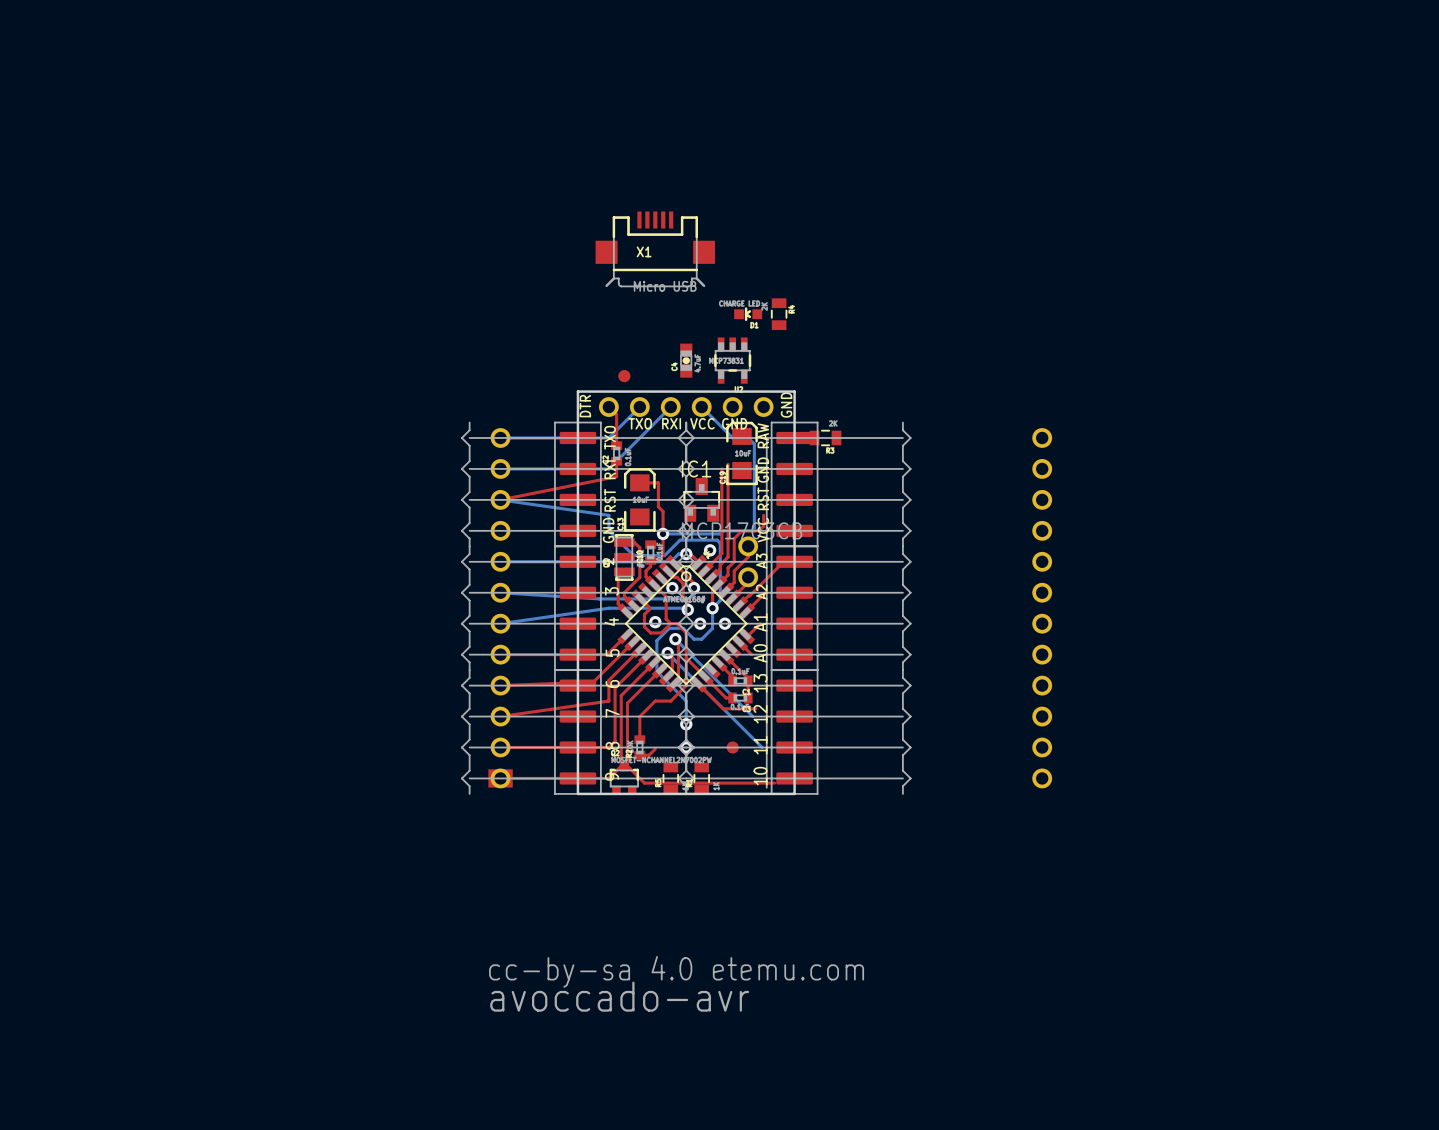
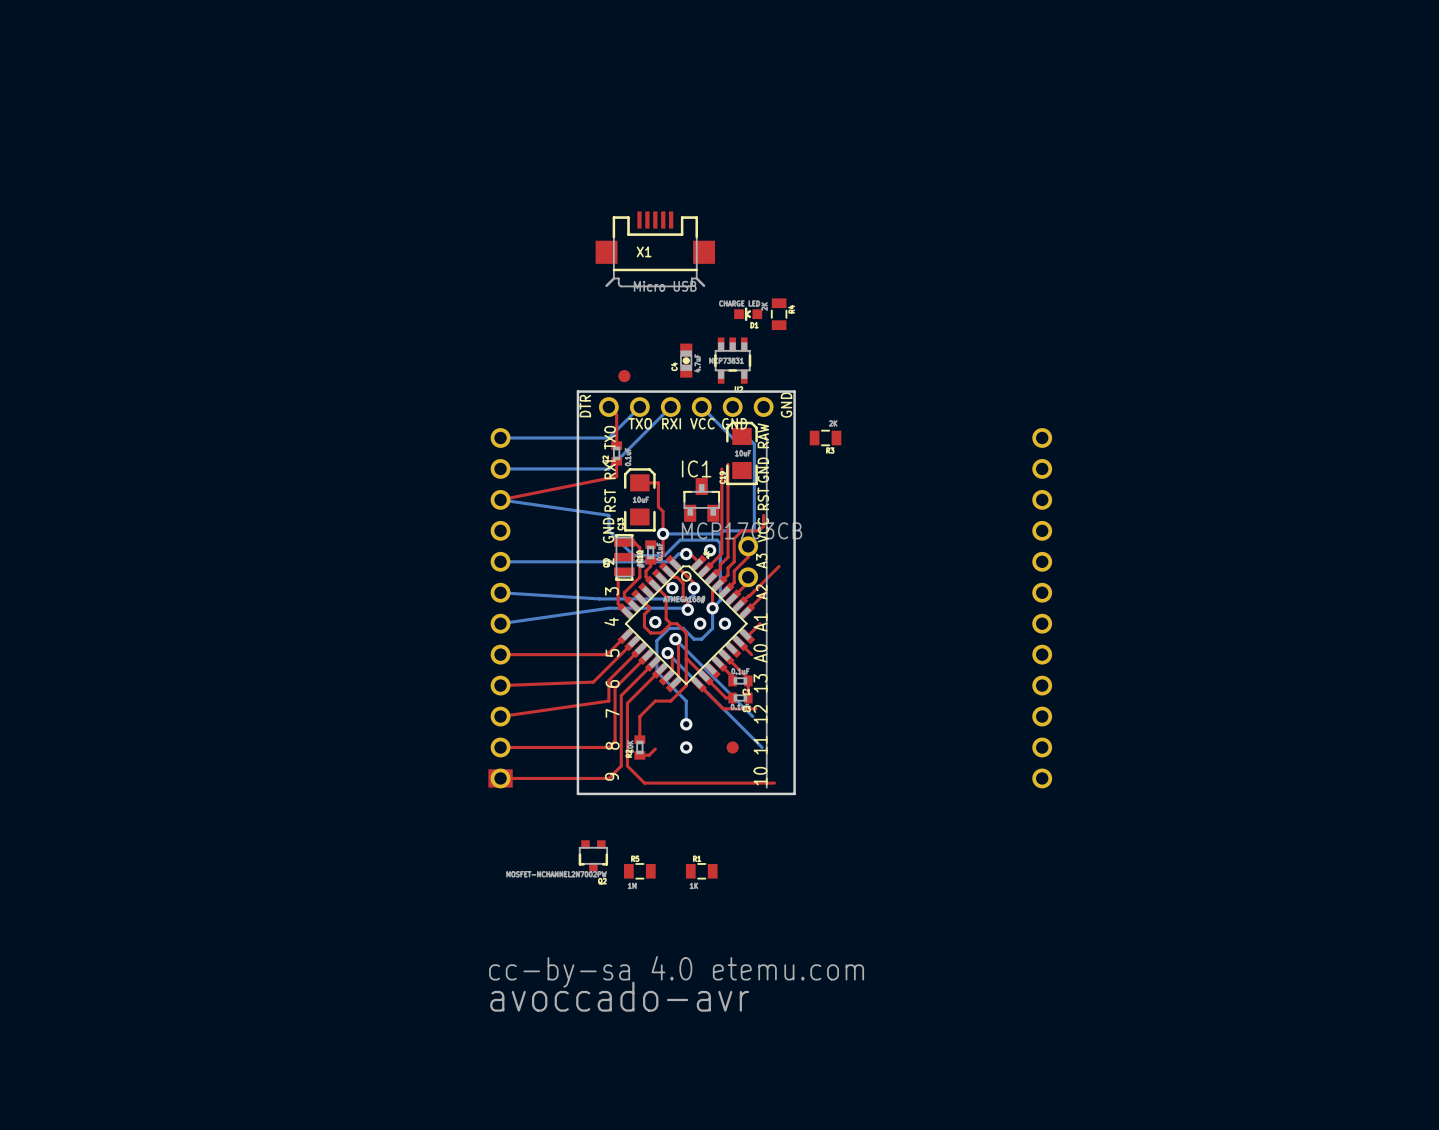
part: (577, 484) -> none
part: (794, 484) -> none
part: (577, 608) -> none
part: (794, 608) -> none
part: (577, 732) -> none
part: (794, 732) -> none
part rotation: 0° (624, 778) -> 180° (593, 855)
part position: (624, 778) -> (593, 855)
part rotation: 0° (670, 778) -> 90° clockwise (639, 871)
part position: (670, 778) -> (639, 871)
part rotation: 0° (701, 778) -> 90° clockwise (701, 871)
part position: (701, 778) -> (701, 871)

